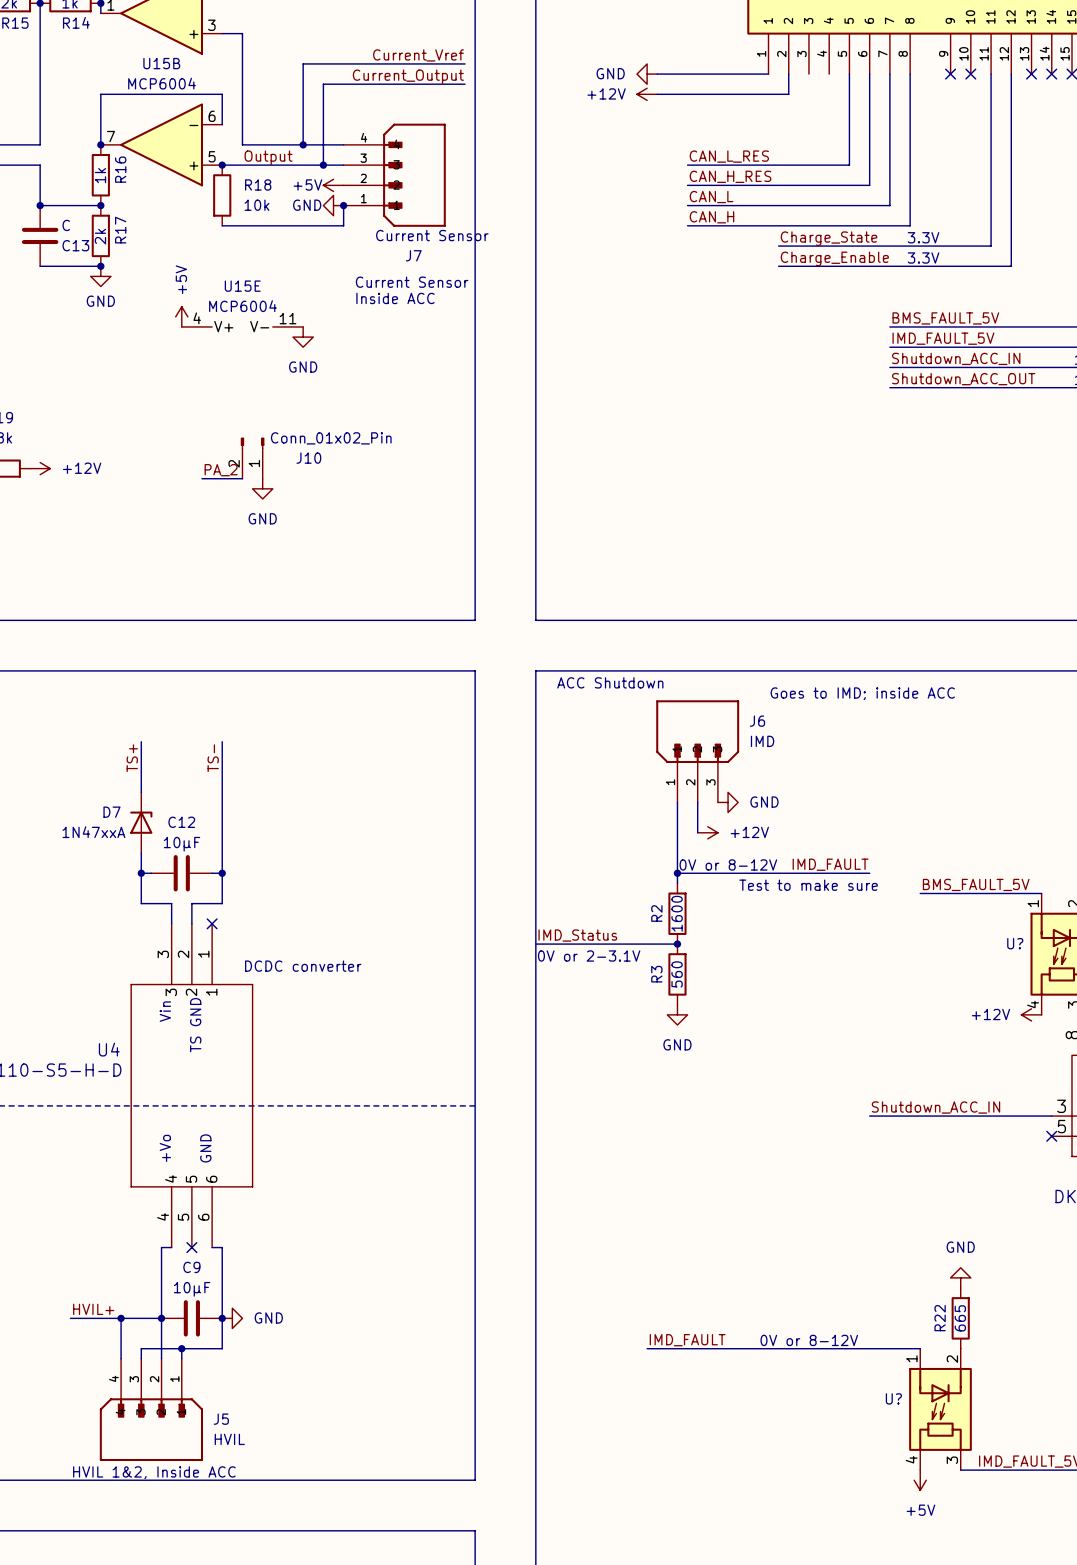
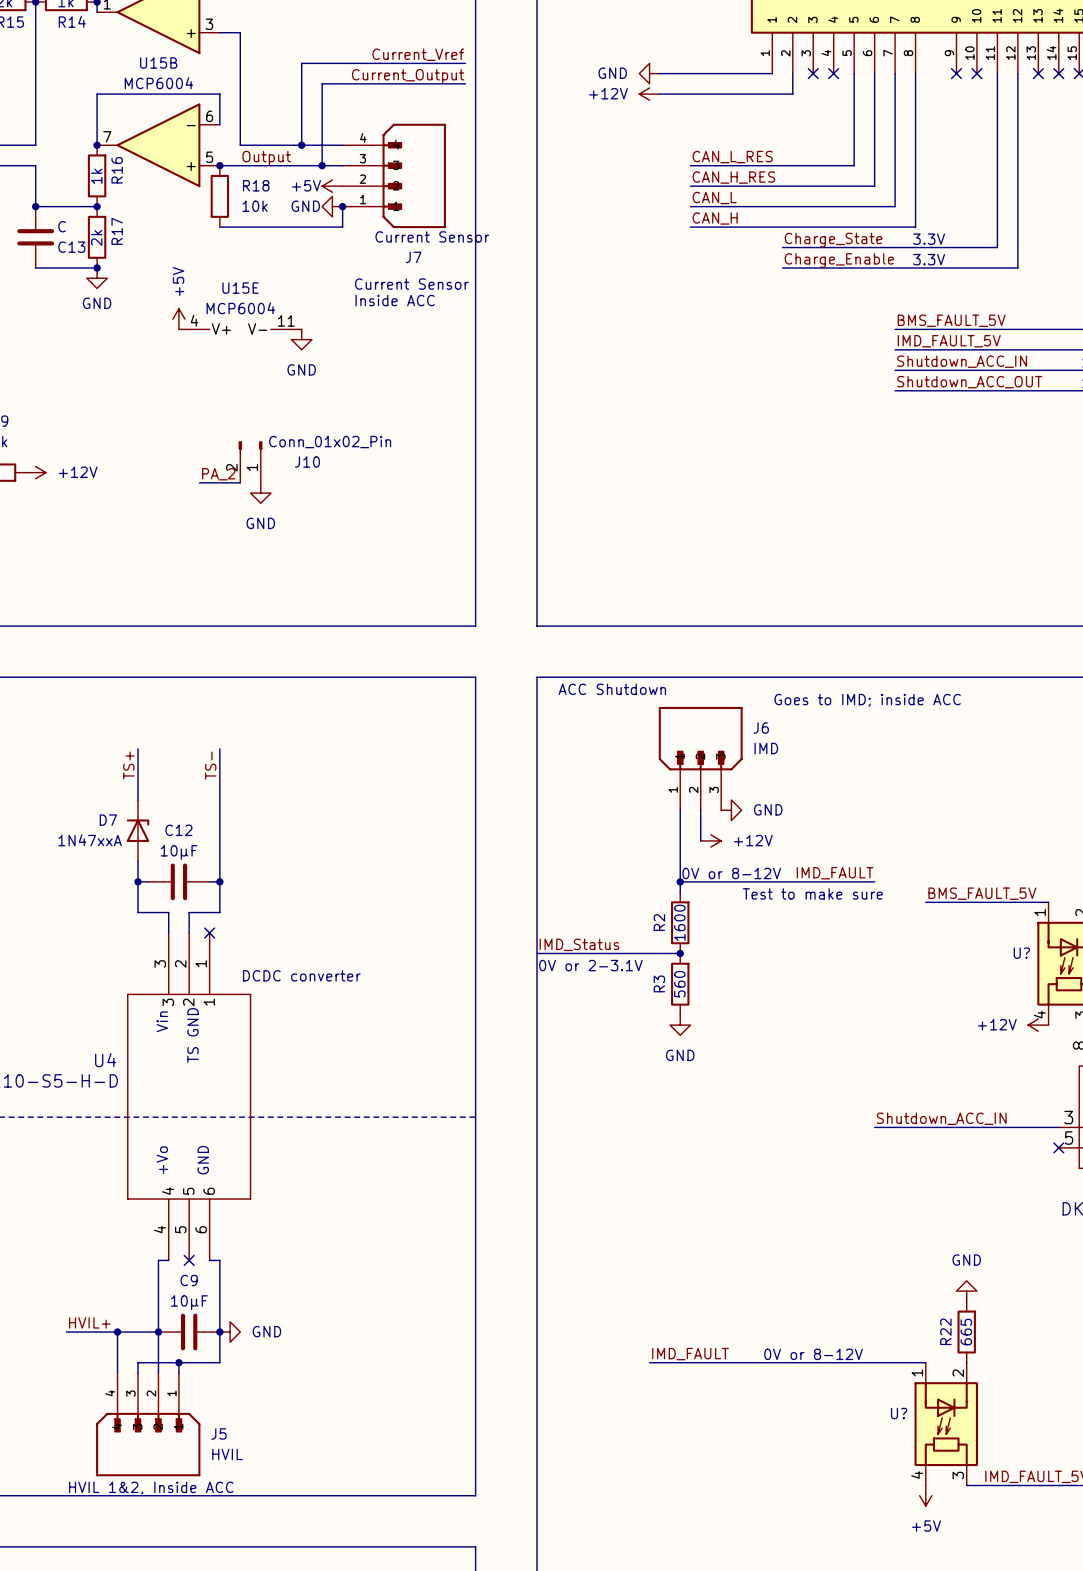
no-connect mark: none -> (813, 73)
no-connect mark: none -> (833, 73)

